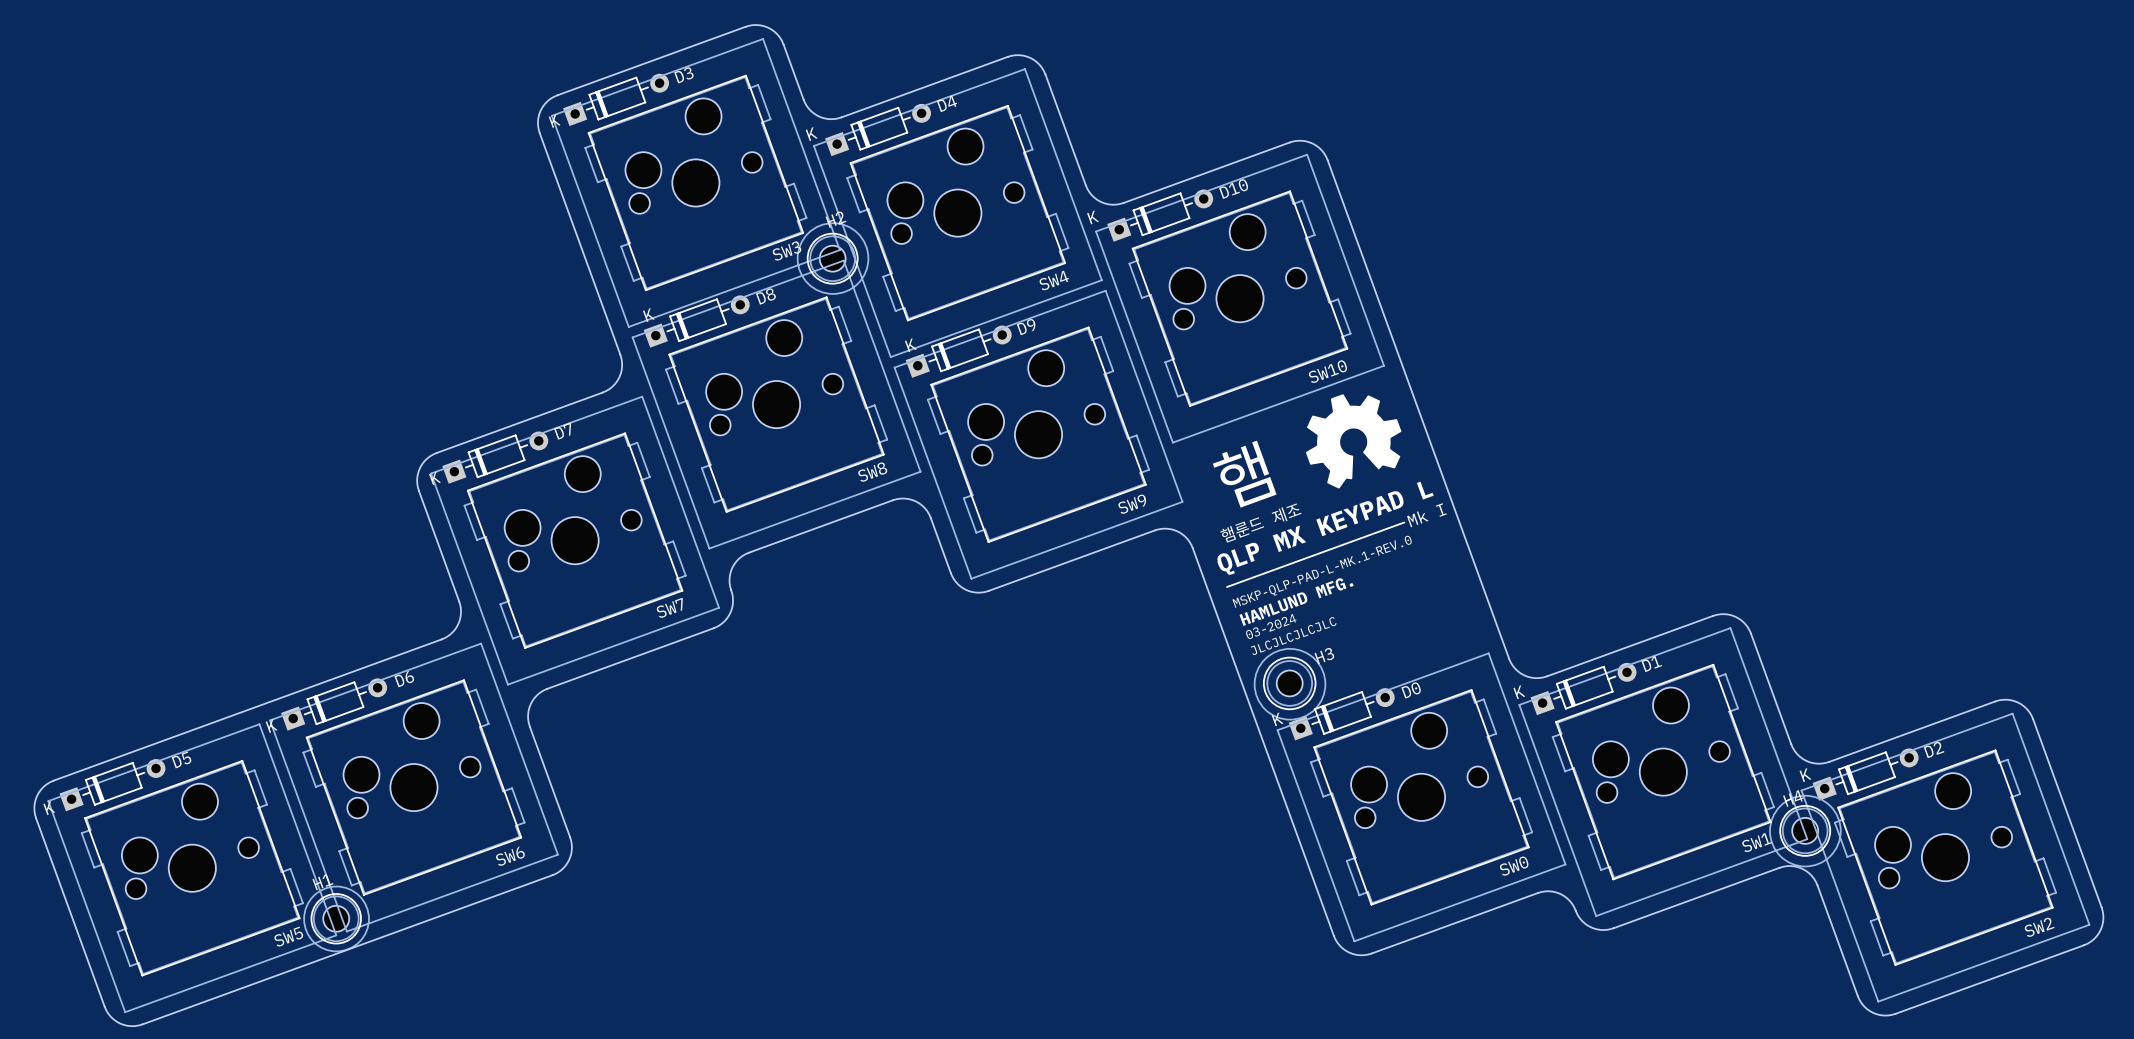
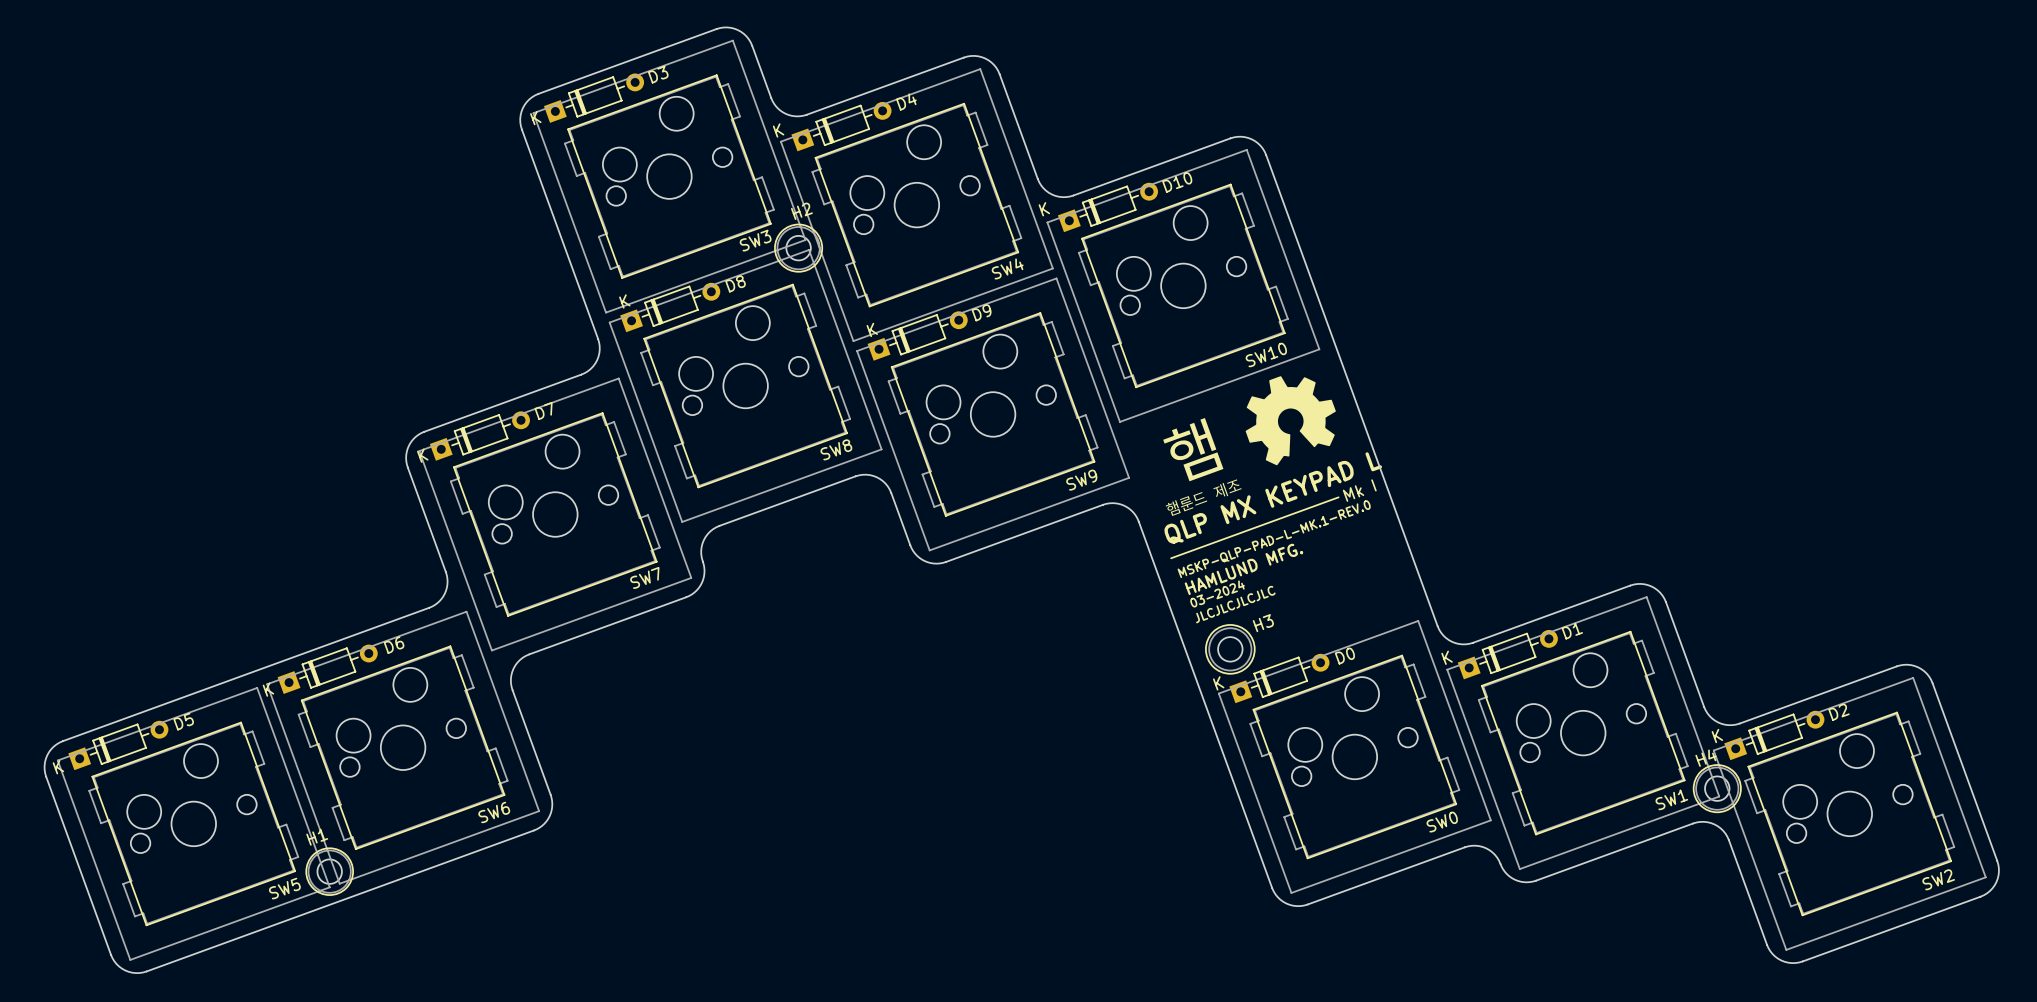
drawing: [796, 222, 870, 295] -> none
drawing: [1253, 648, 1327, 721] -> none
drawing: [1769, 794, 1842, 868] -> none
drawing: [303, 885, 370, 953] -> none

